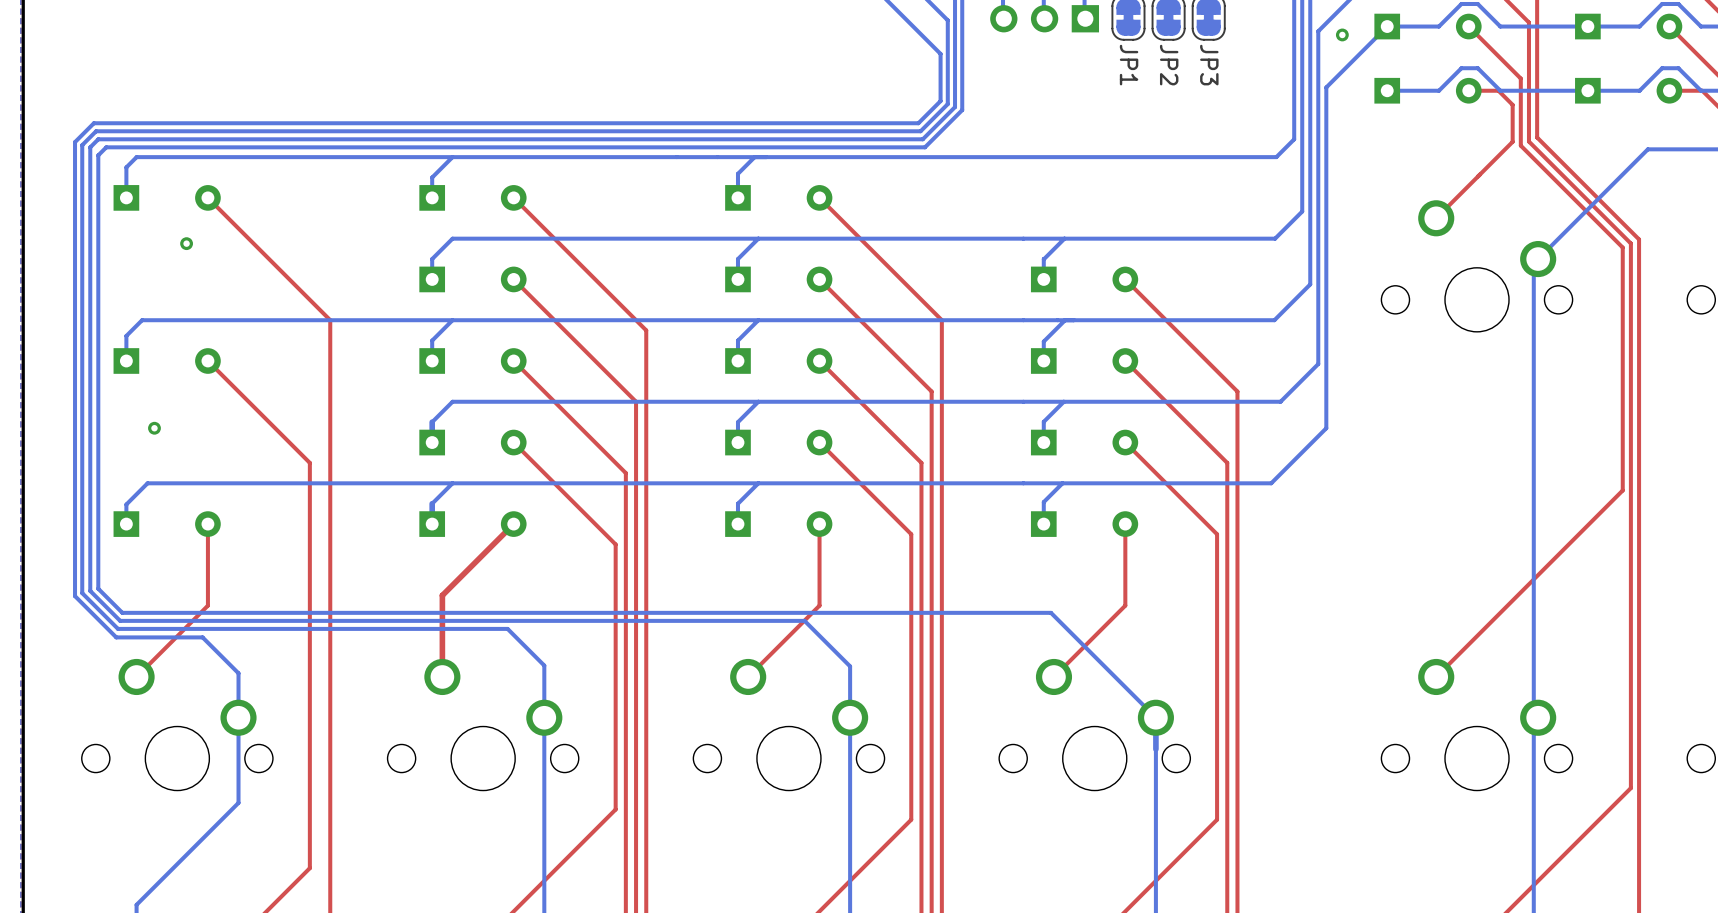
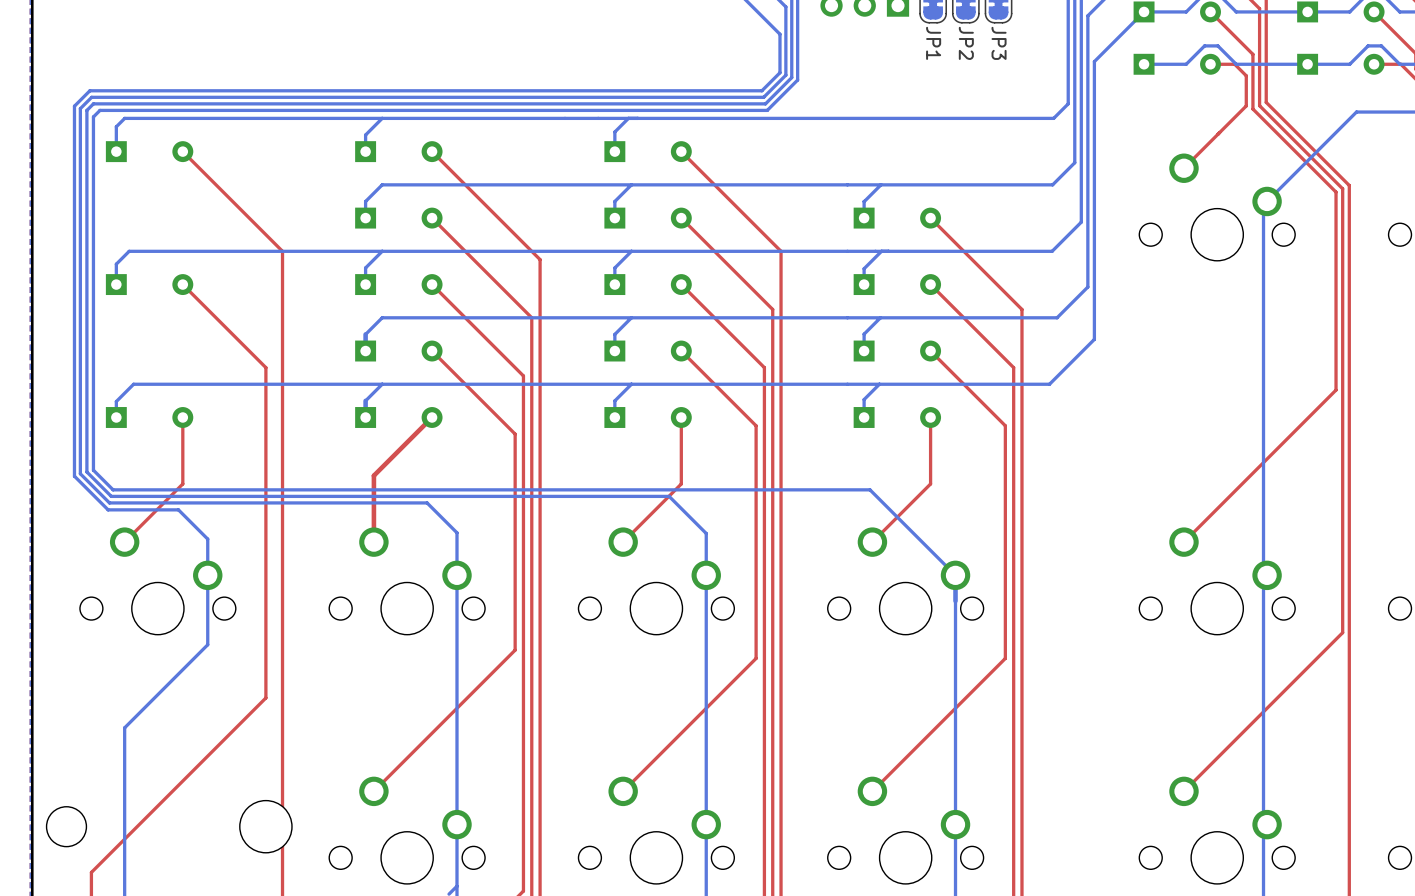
via: (1342, 34) -> none
via: (186, 243) -> none
via: (154, 428) -> none

